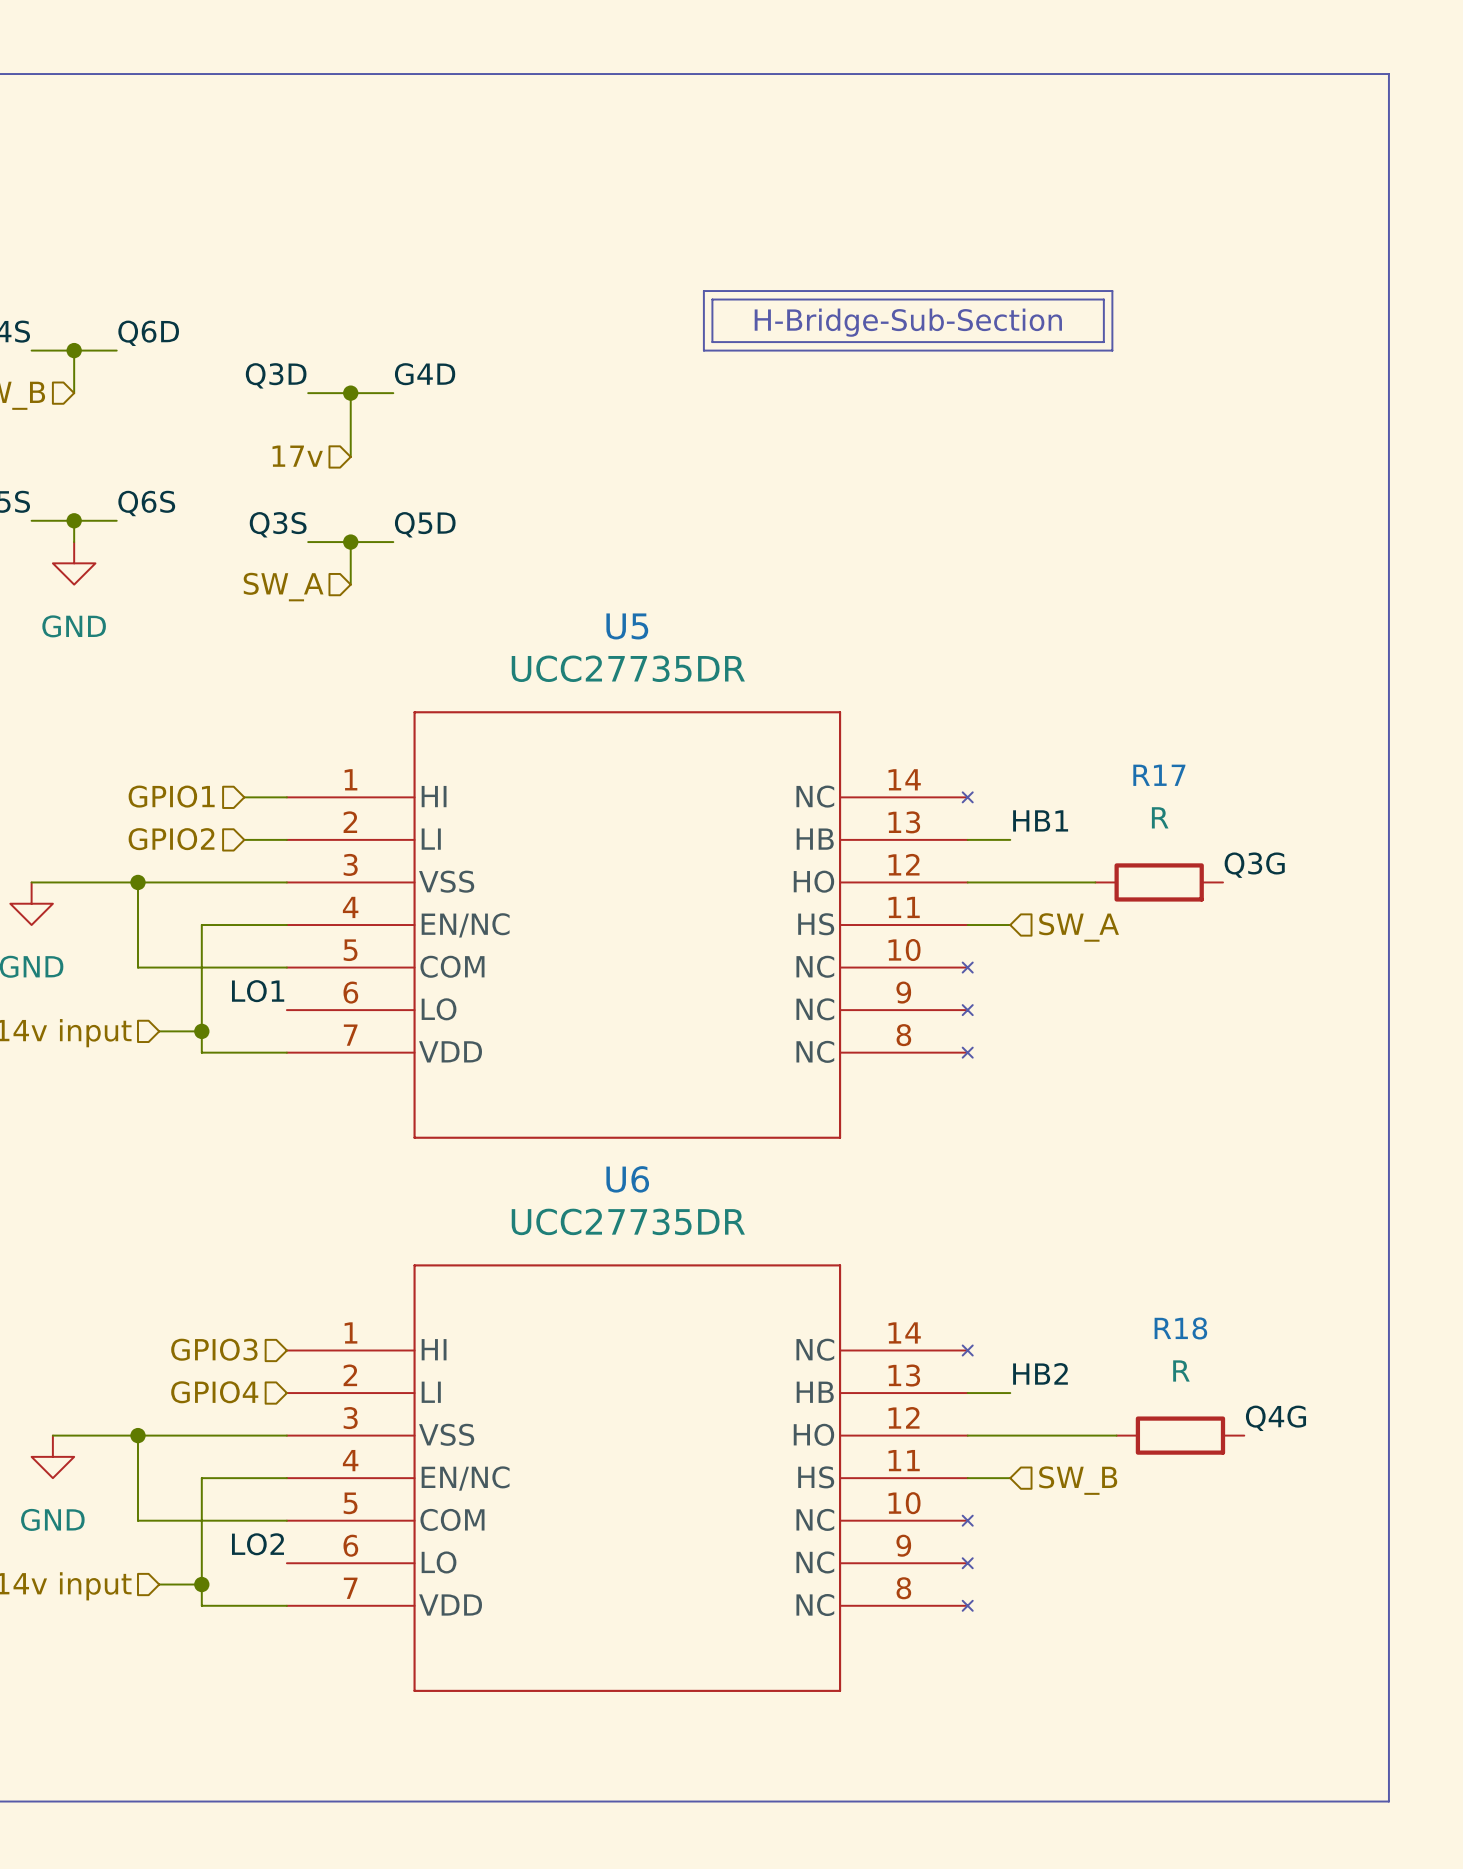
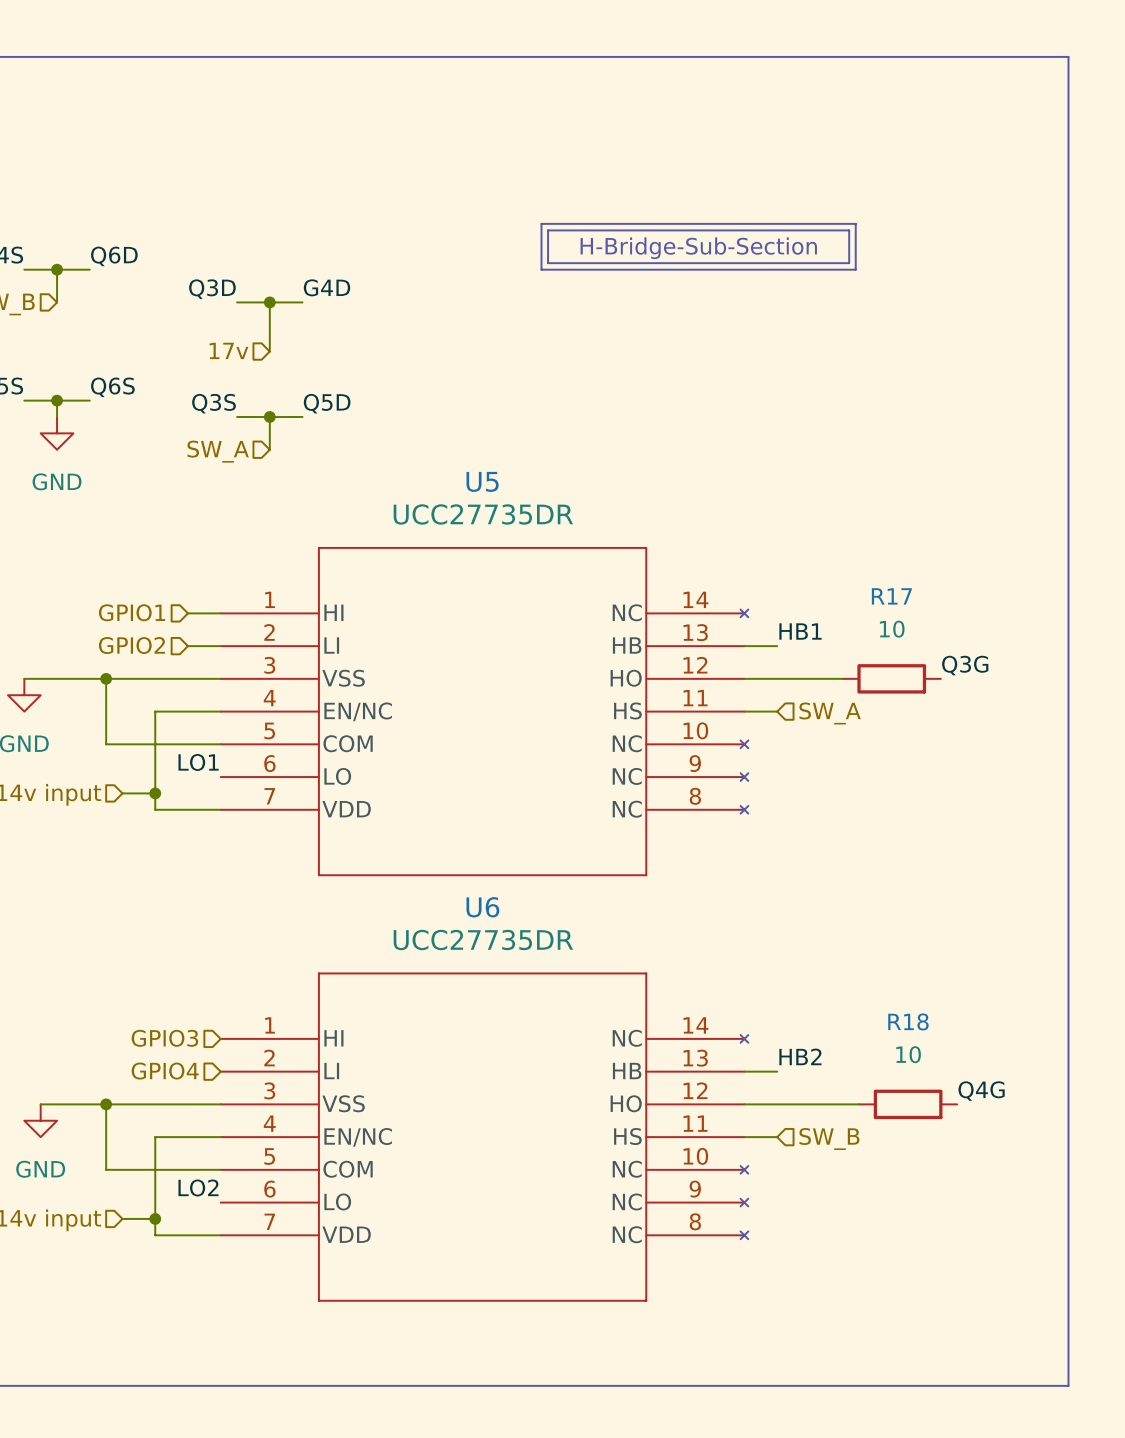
R17 value: R (1160, 817) -> 10 (892, 629)
R18 value: R (1181, 1370) -> 10 (908, 1054)

